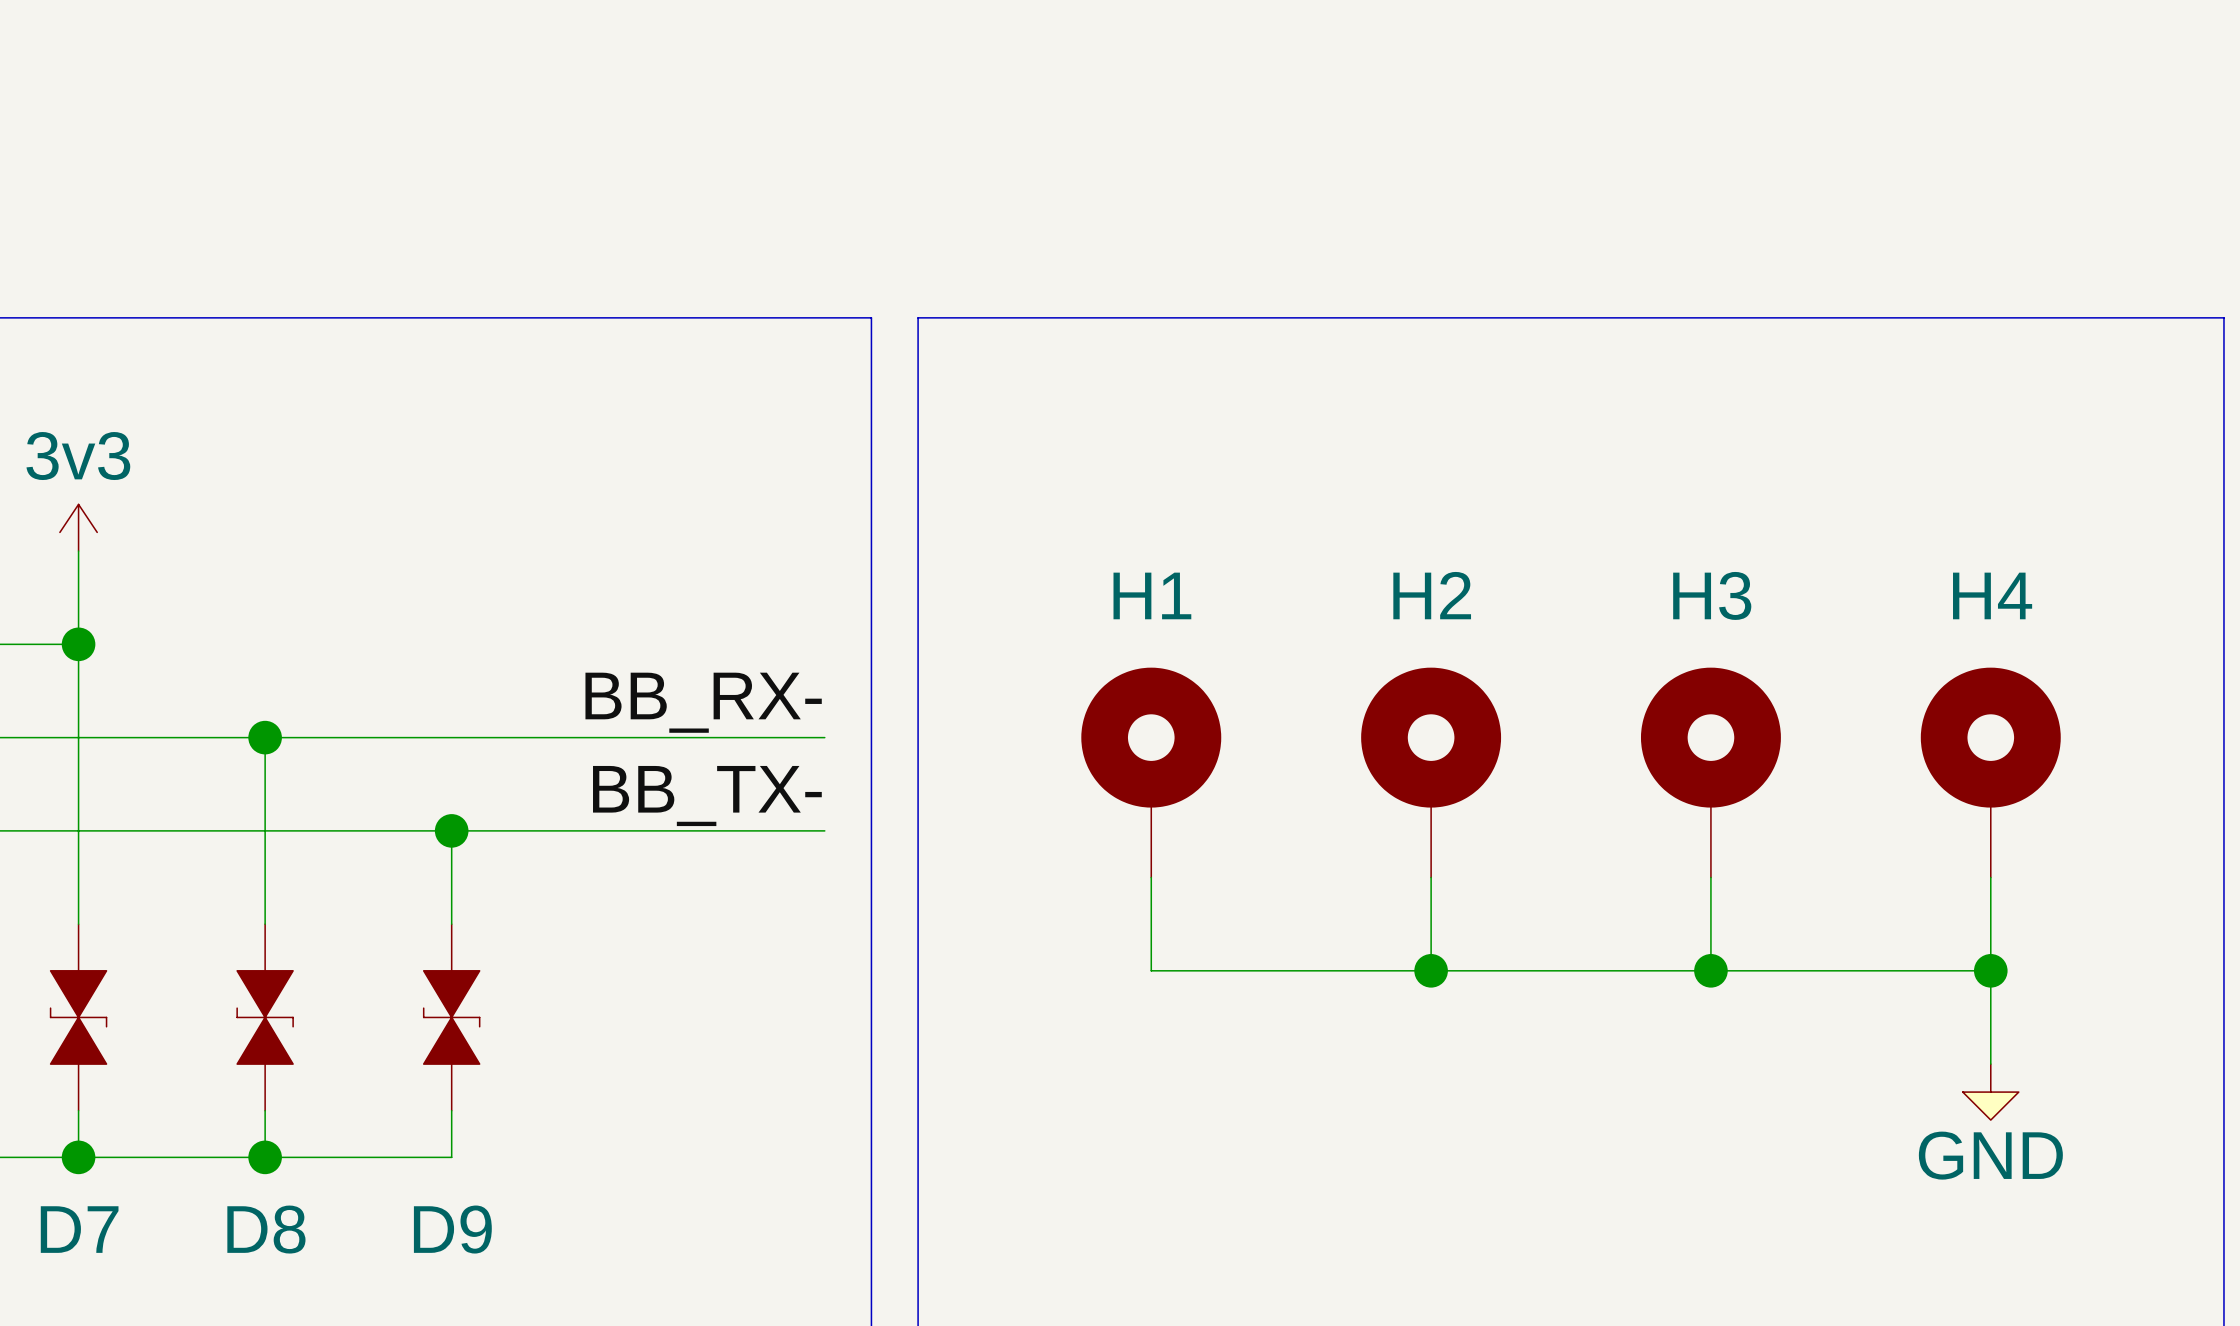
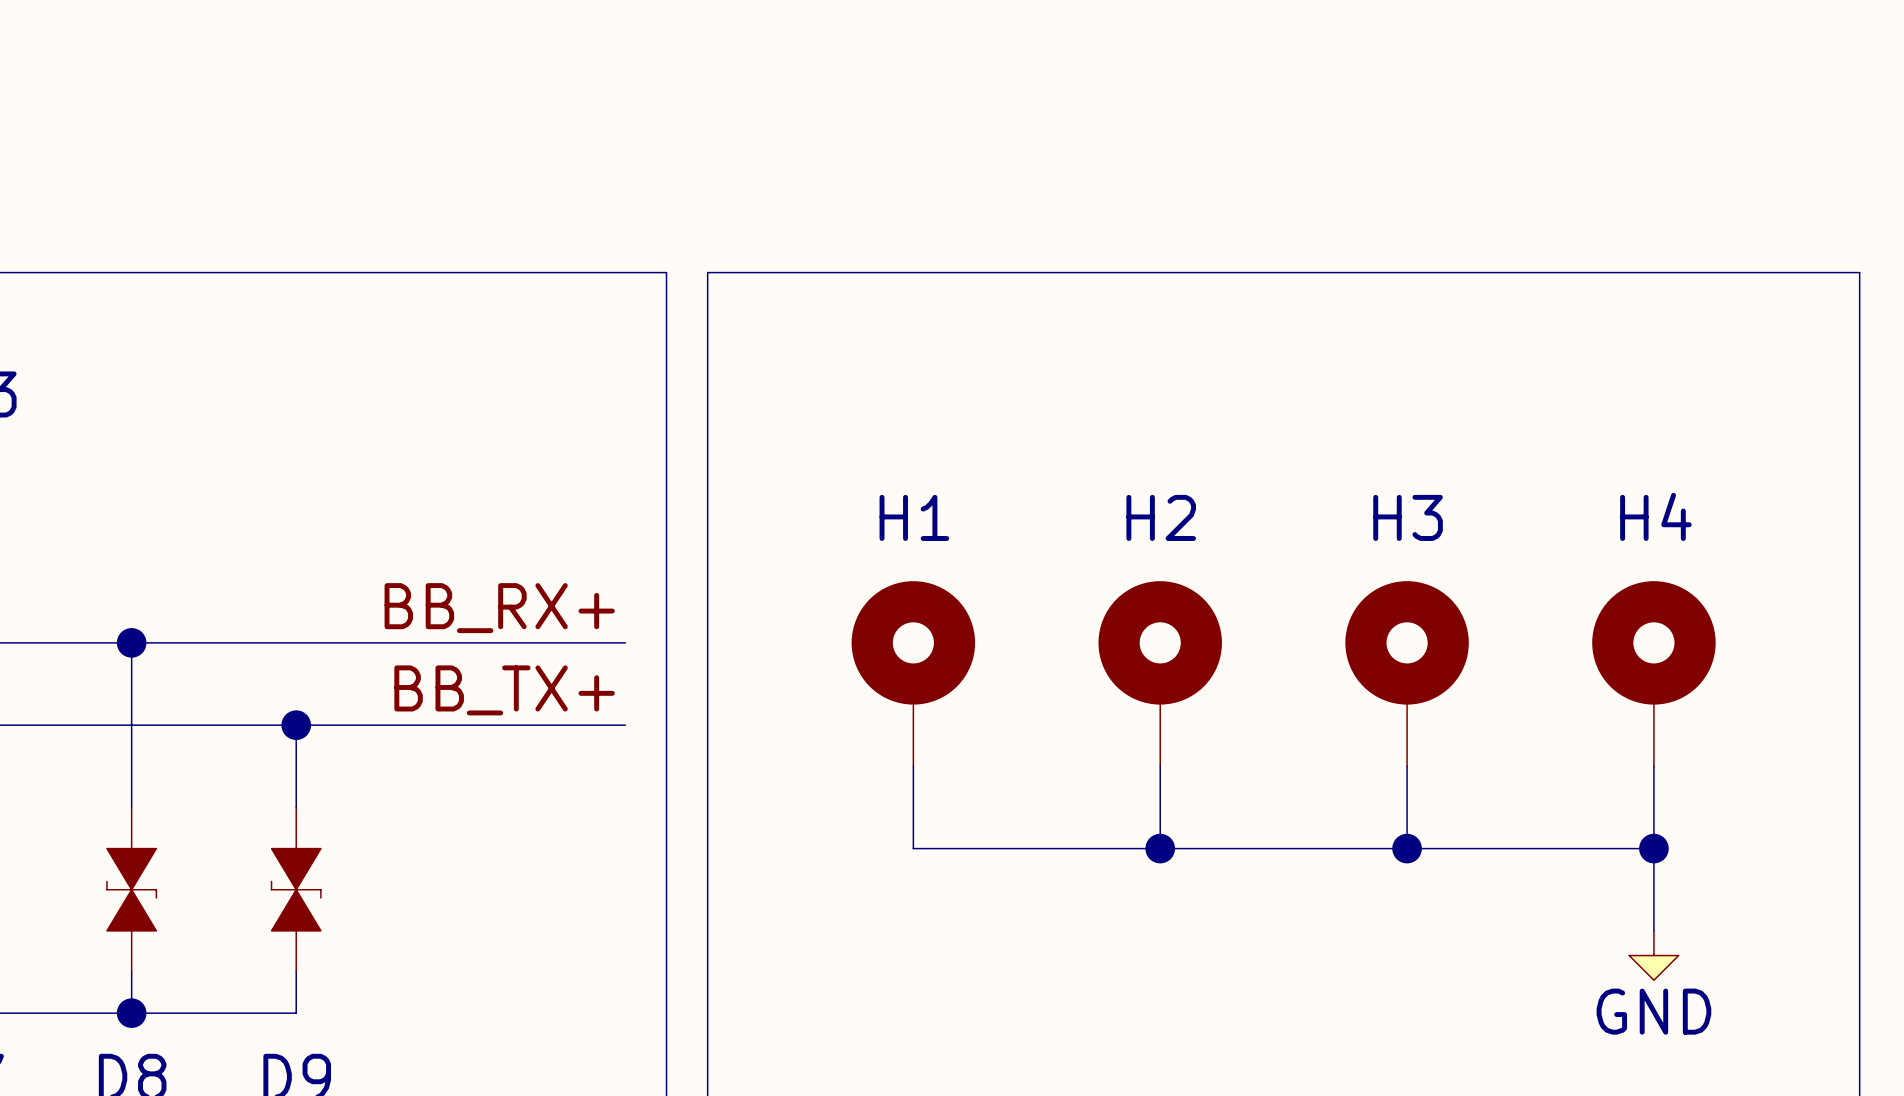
label: BB_RX- (703, 702) -> BB_RX+ (499, 608)
label: BB_TX- (707, 796) -> BB_TX+ (504, 690)

